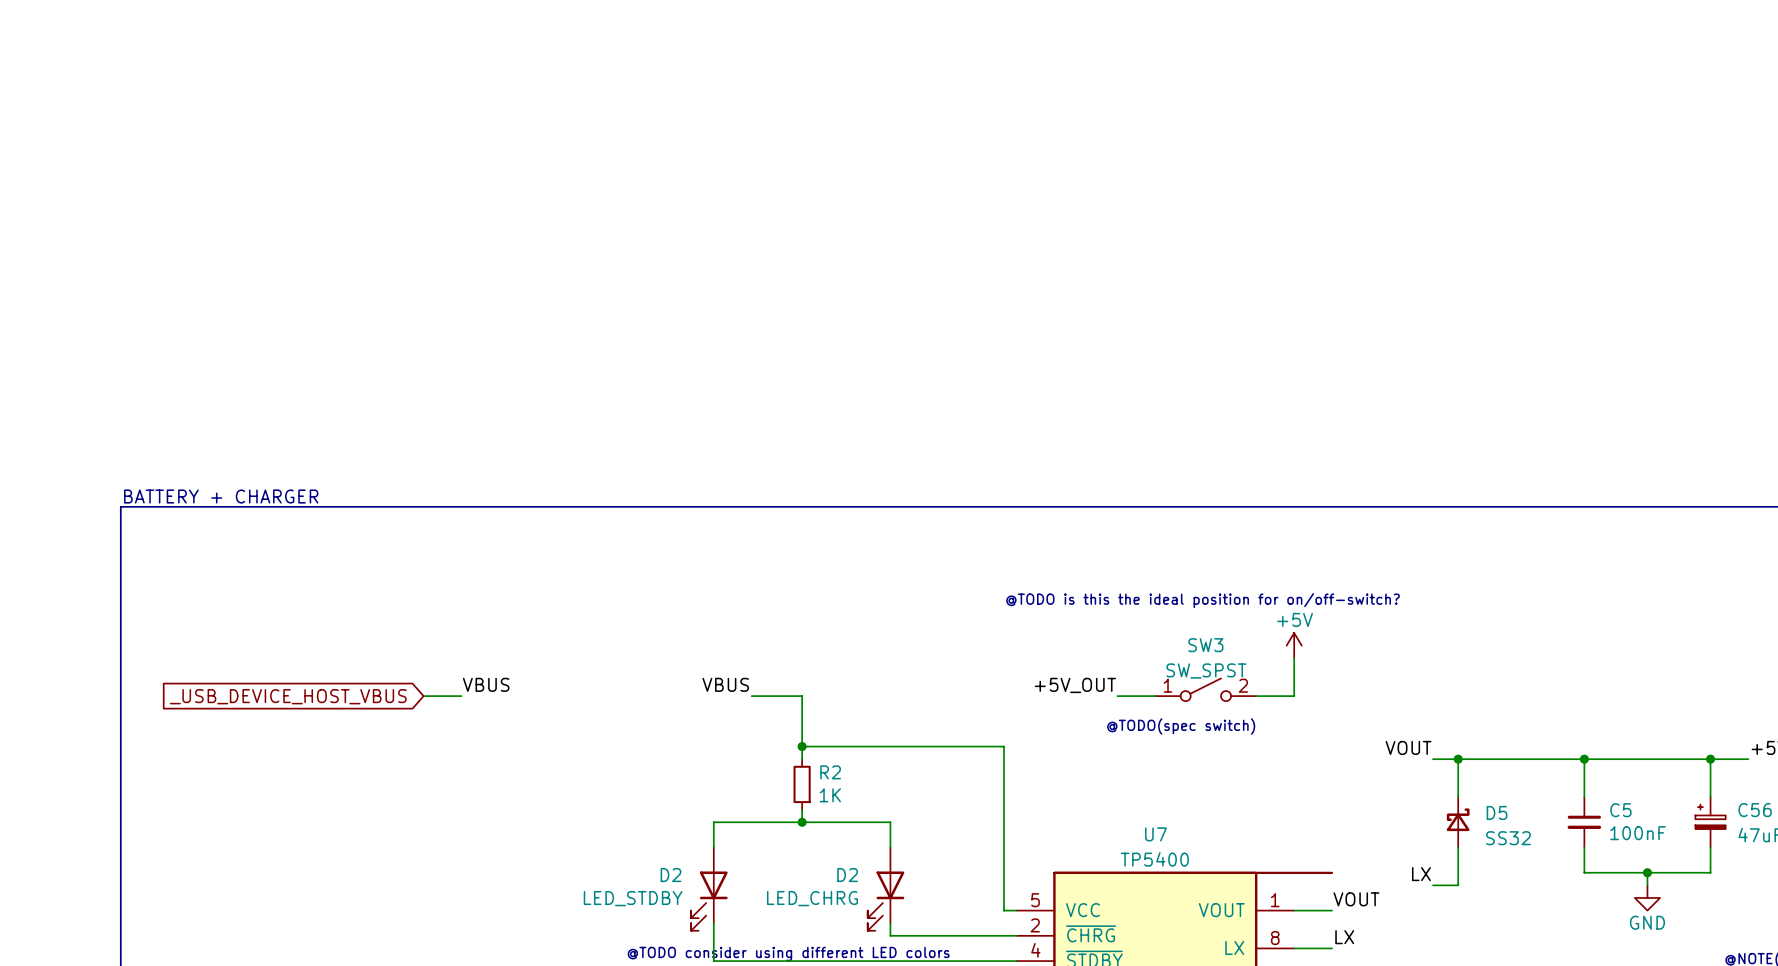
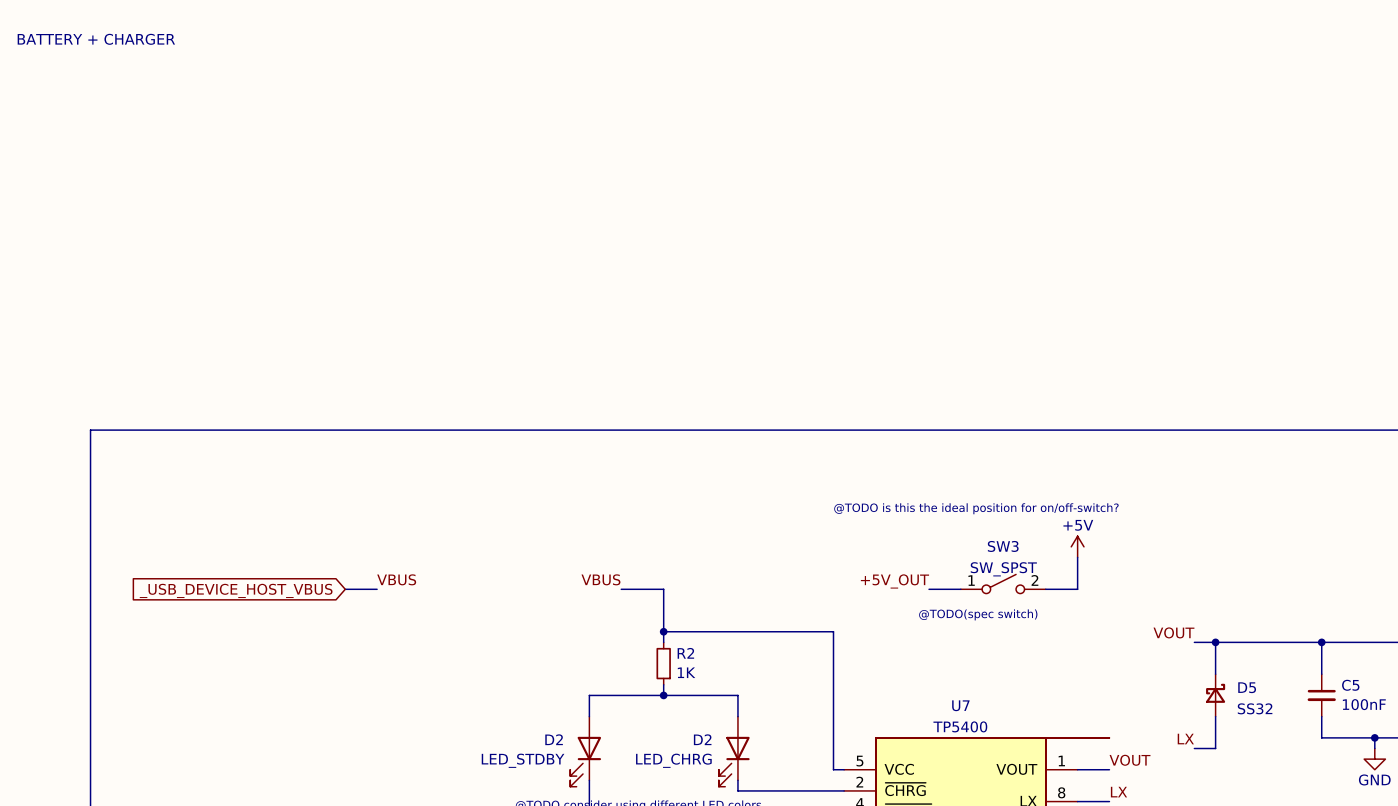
text: none -> BATTERY + CHARGER (96, 39)
text: BATTERY + CHARGER (221, 496) -> none

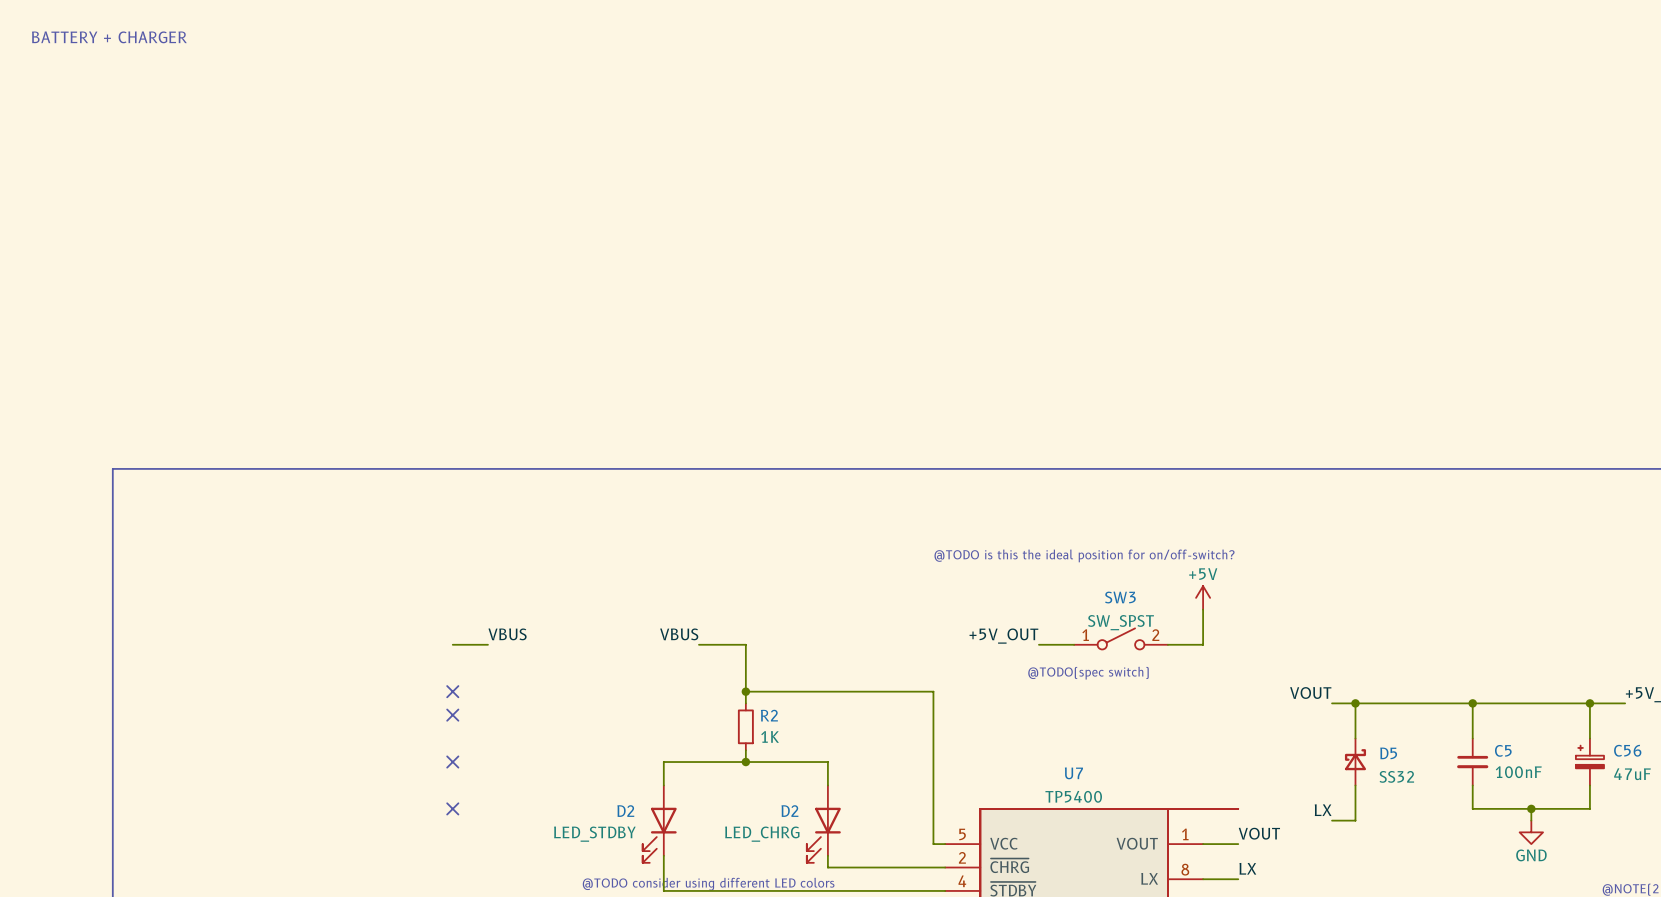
label position: VBUS (396, 579) -> VBUS (507, 634)
wire: (345, 589) (377, 589) -> (452, 644) (487, 644)
global label: _USB_DEVICE_HOST_VBUS (236, 590) -> none
no-connect mark: none -> (452, 691)
no-connect mark: none -> (452, 715)
no-connect mark: none -> (452, 762)
no-connect mark: none -> (452, 808)

